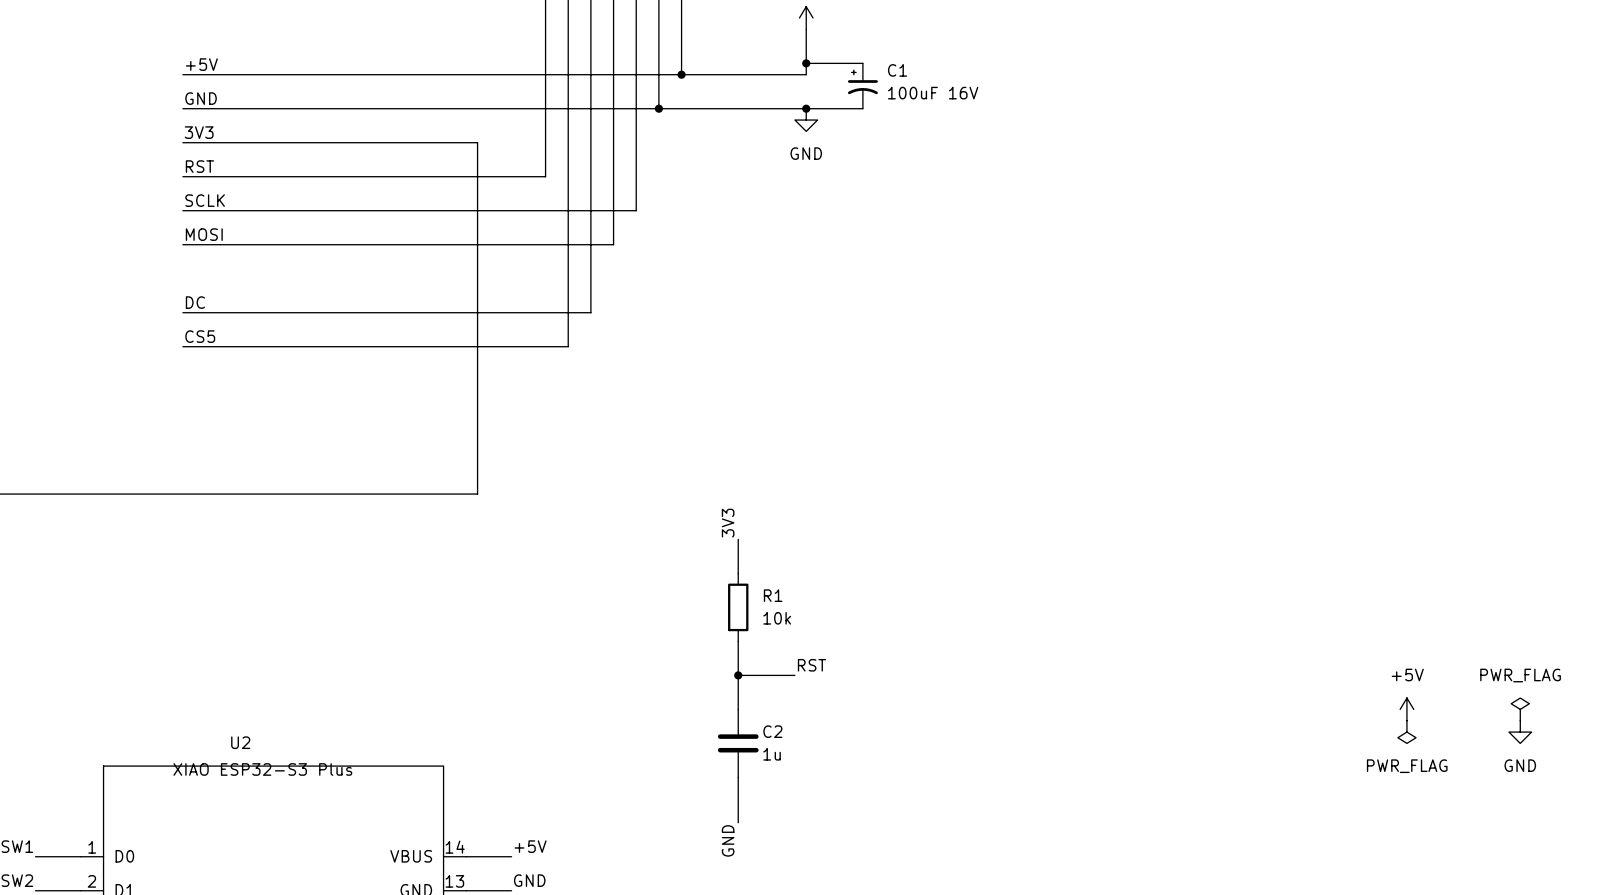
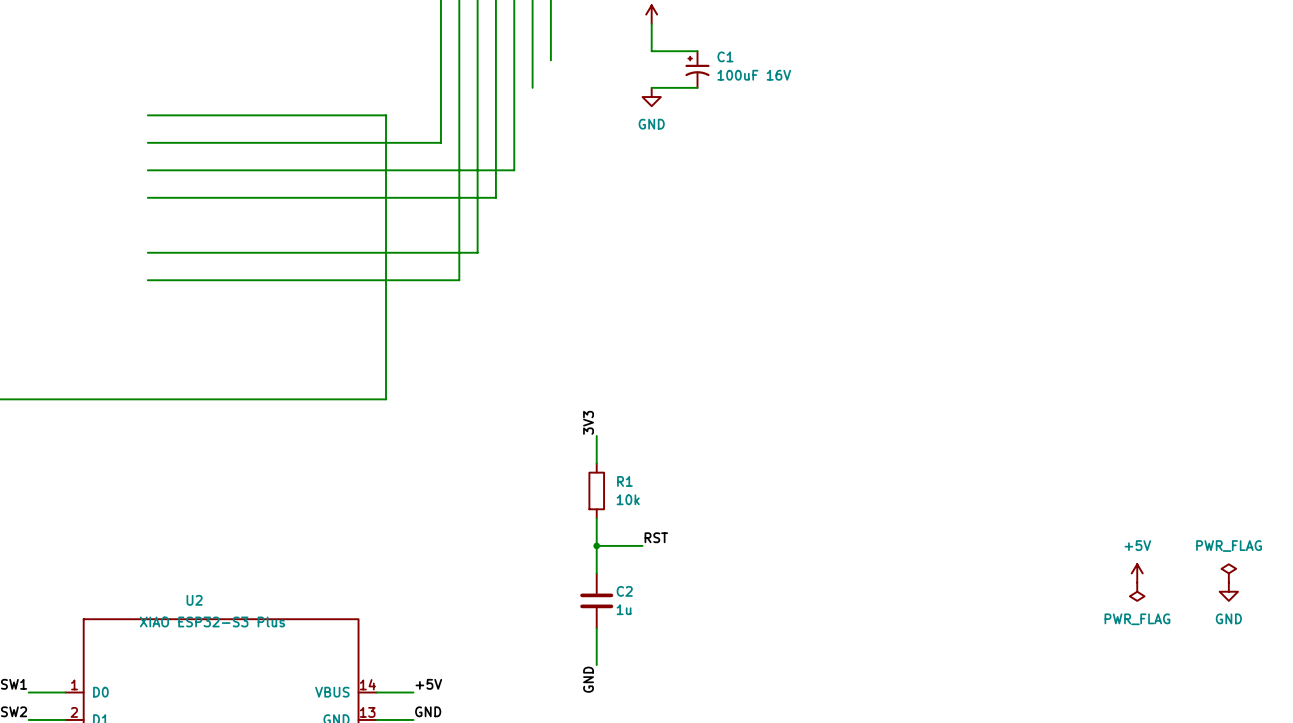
wire: (806, 63) (806, 74) (182, 74) -> none
junction: (806, 63) -> none
label: +5V (201, 64) -> none
junction: (681, 74) -> none
label: GND (201, 98) -> none
wire: (182, 108) (806, 108) -> none
junction: (658, 108) -> none
junction: (806, 108) -> none
label: 3V3 (199, 132) -> none
label: RST (199, 166) -> none
label: SCLK (205, 200) -> none
label: MOSI (204, 234) -> none
label: DC (195, 302) -> none
label: CS5 (200, 336) -> none

